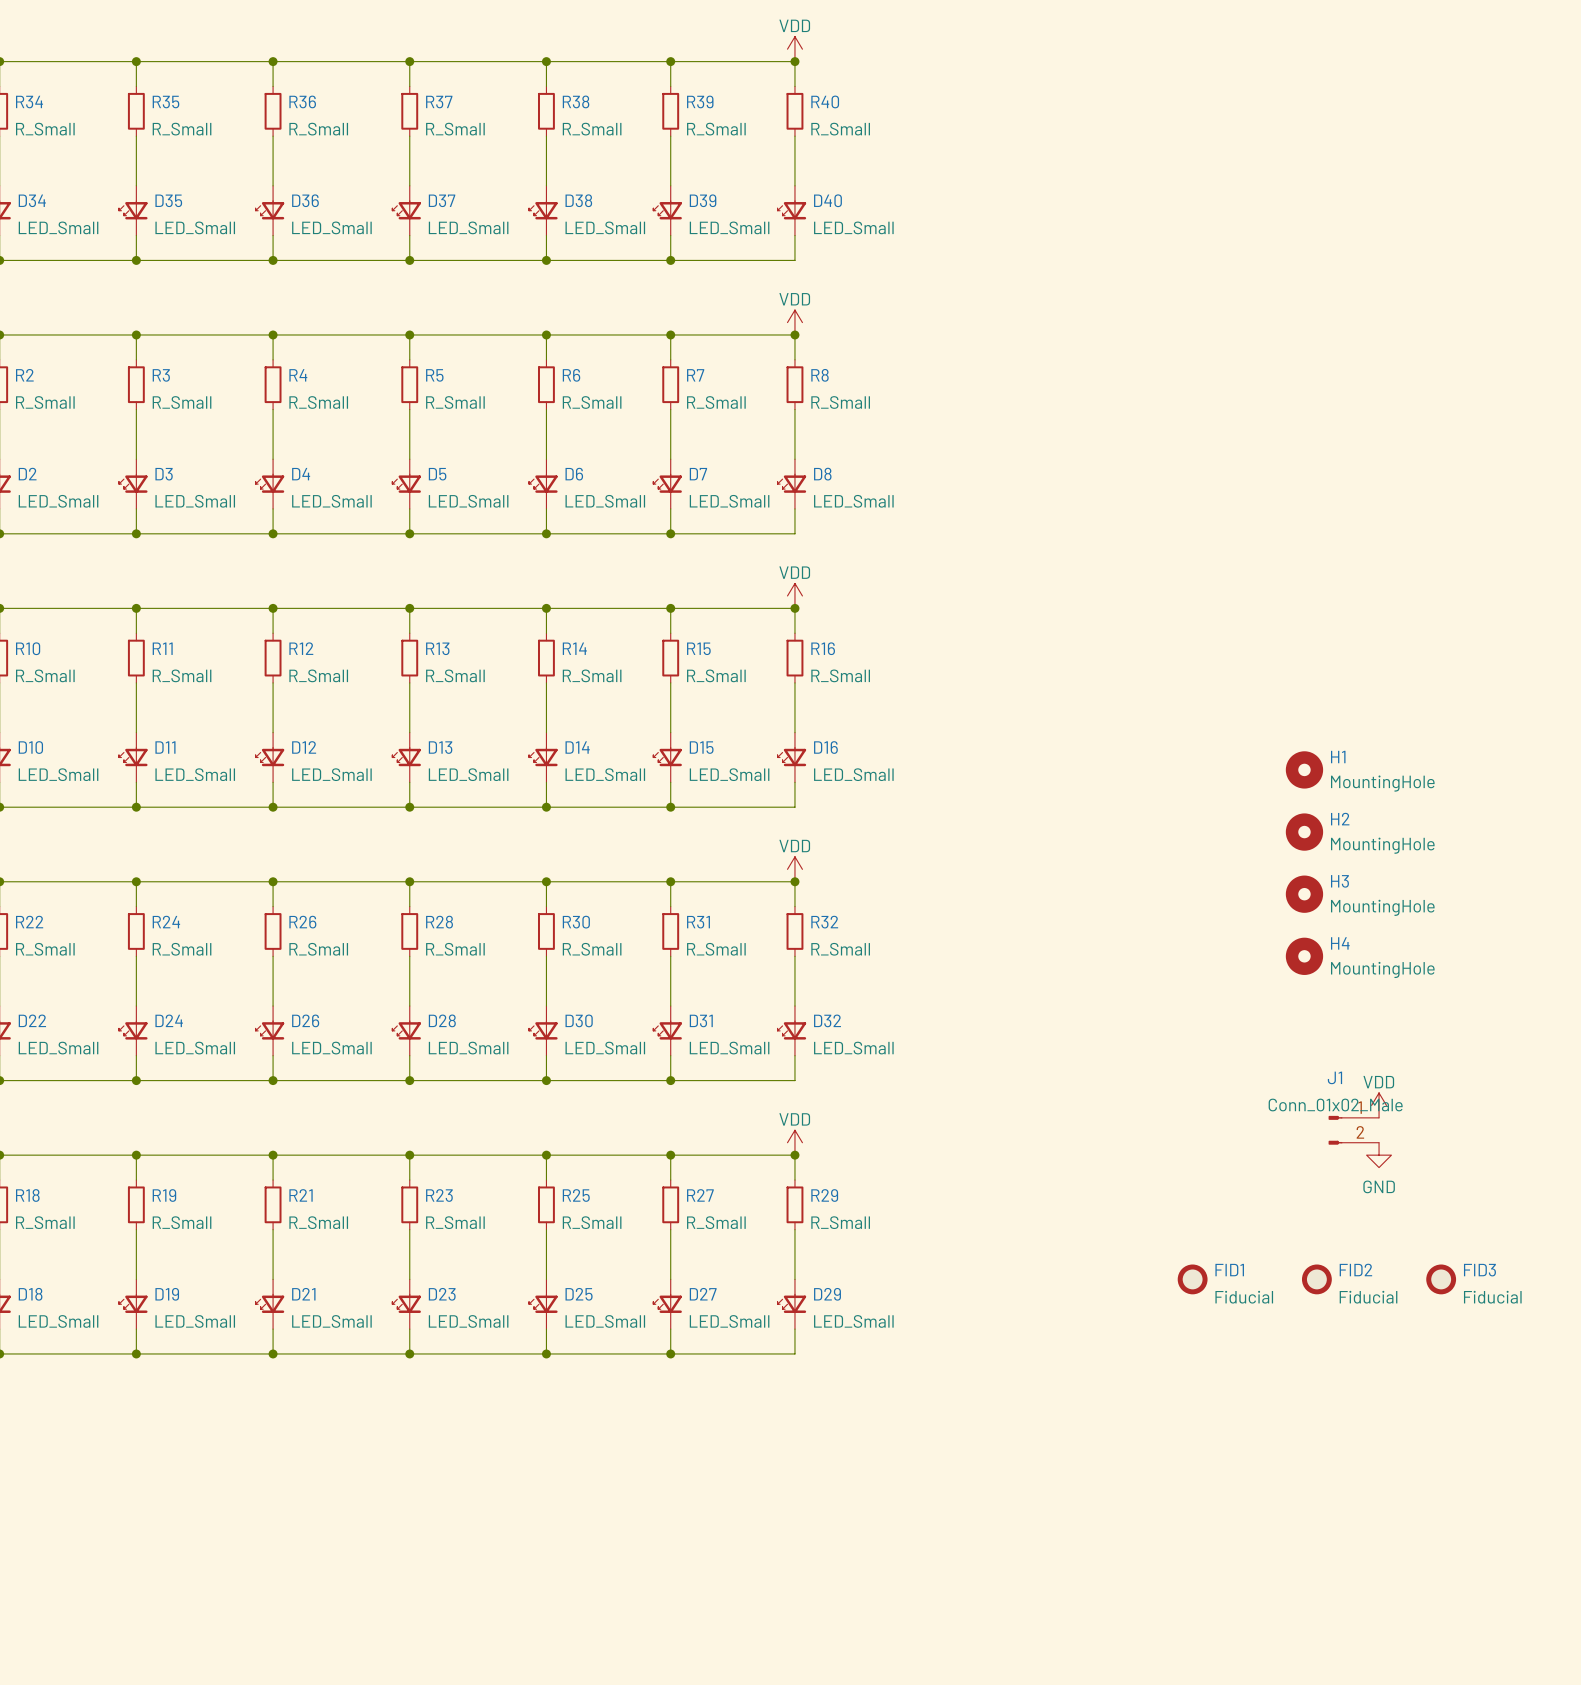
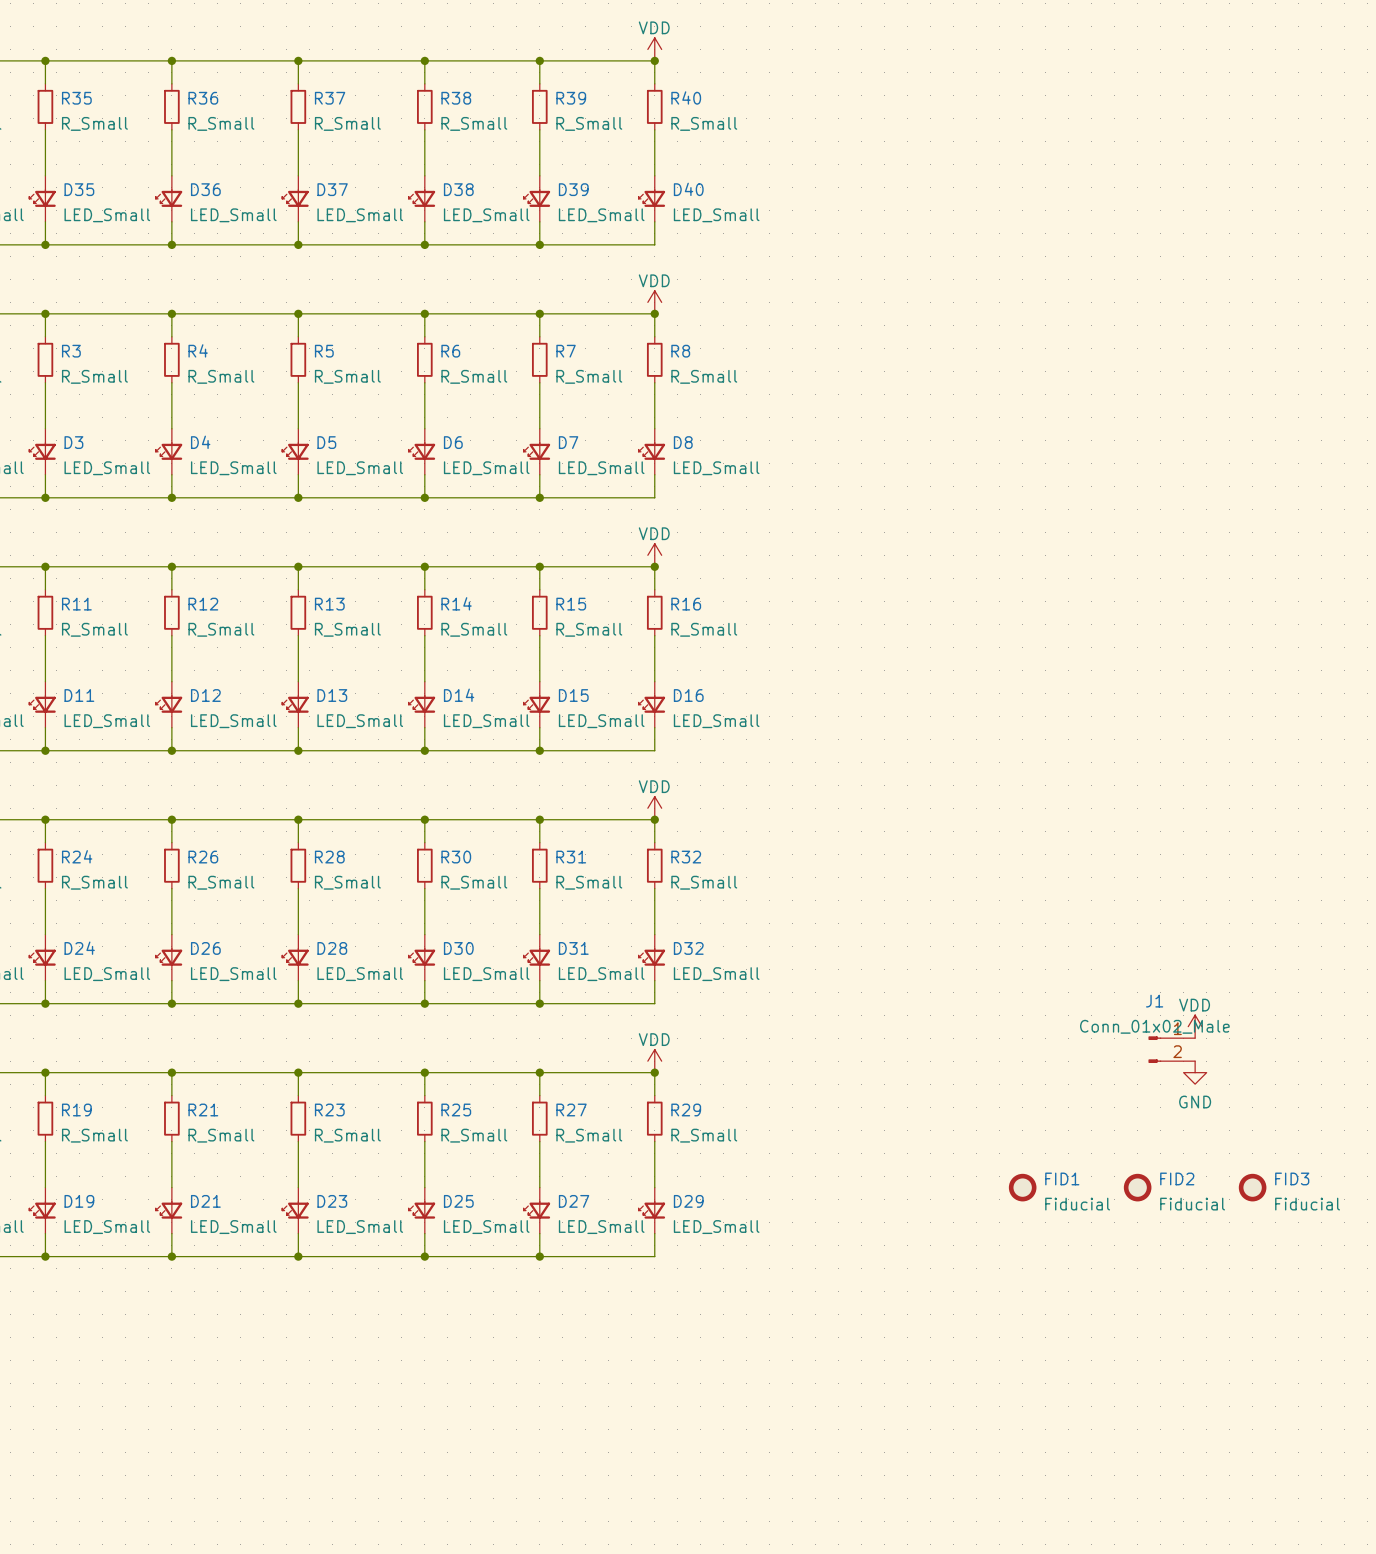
H1: MountingHole (1304, 769) -> none
H2: MountingHole (1304, 832) -> none
H3: MountingHole (1304, 894) -> none
H4: MountingHole (1304, 956) -> none

